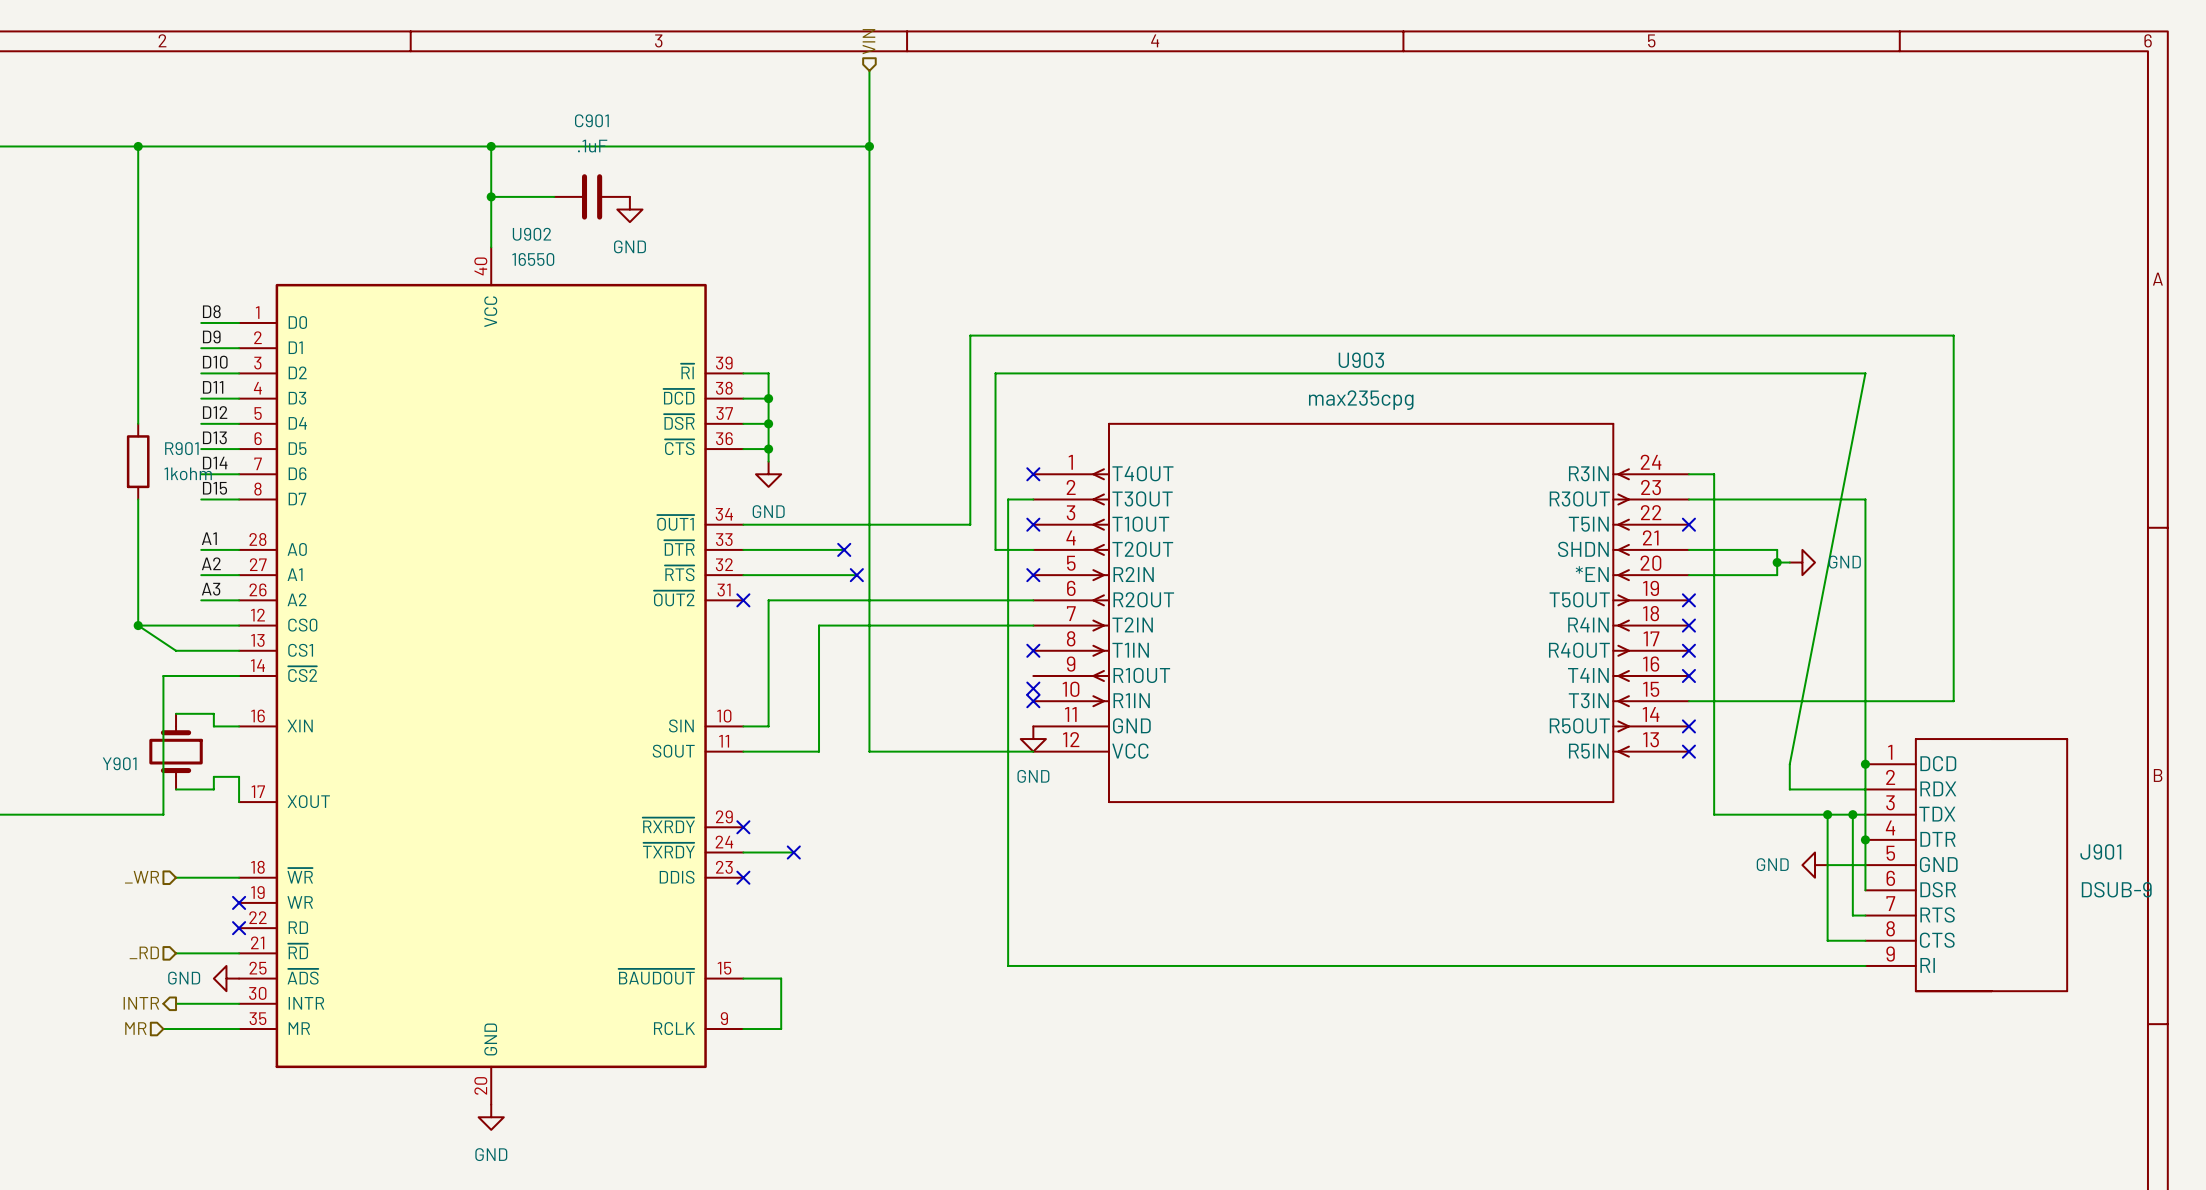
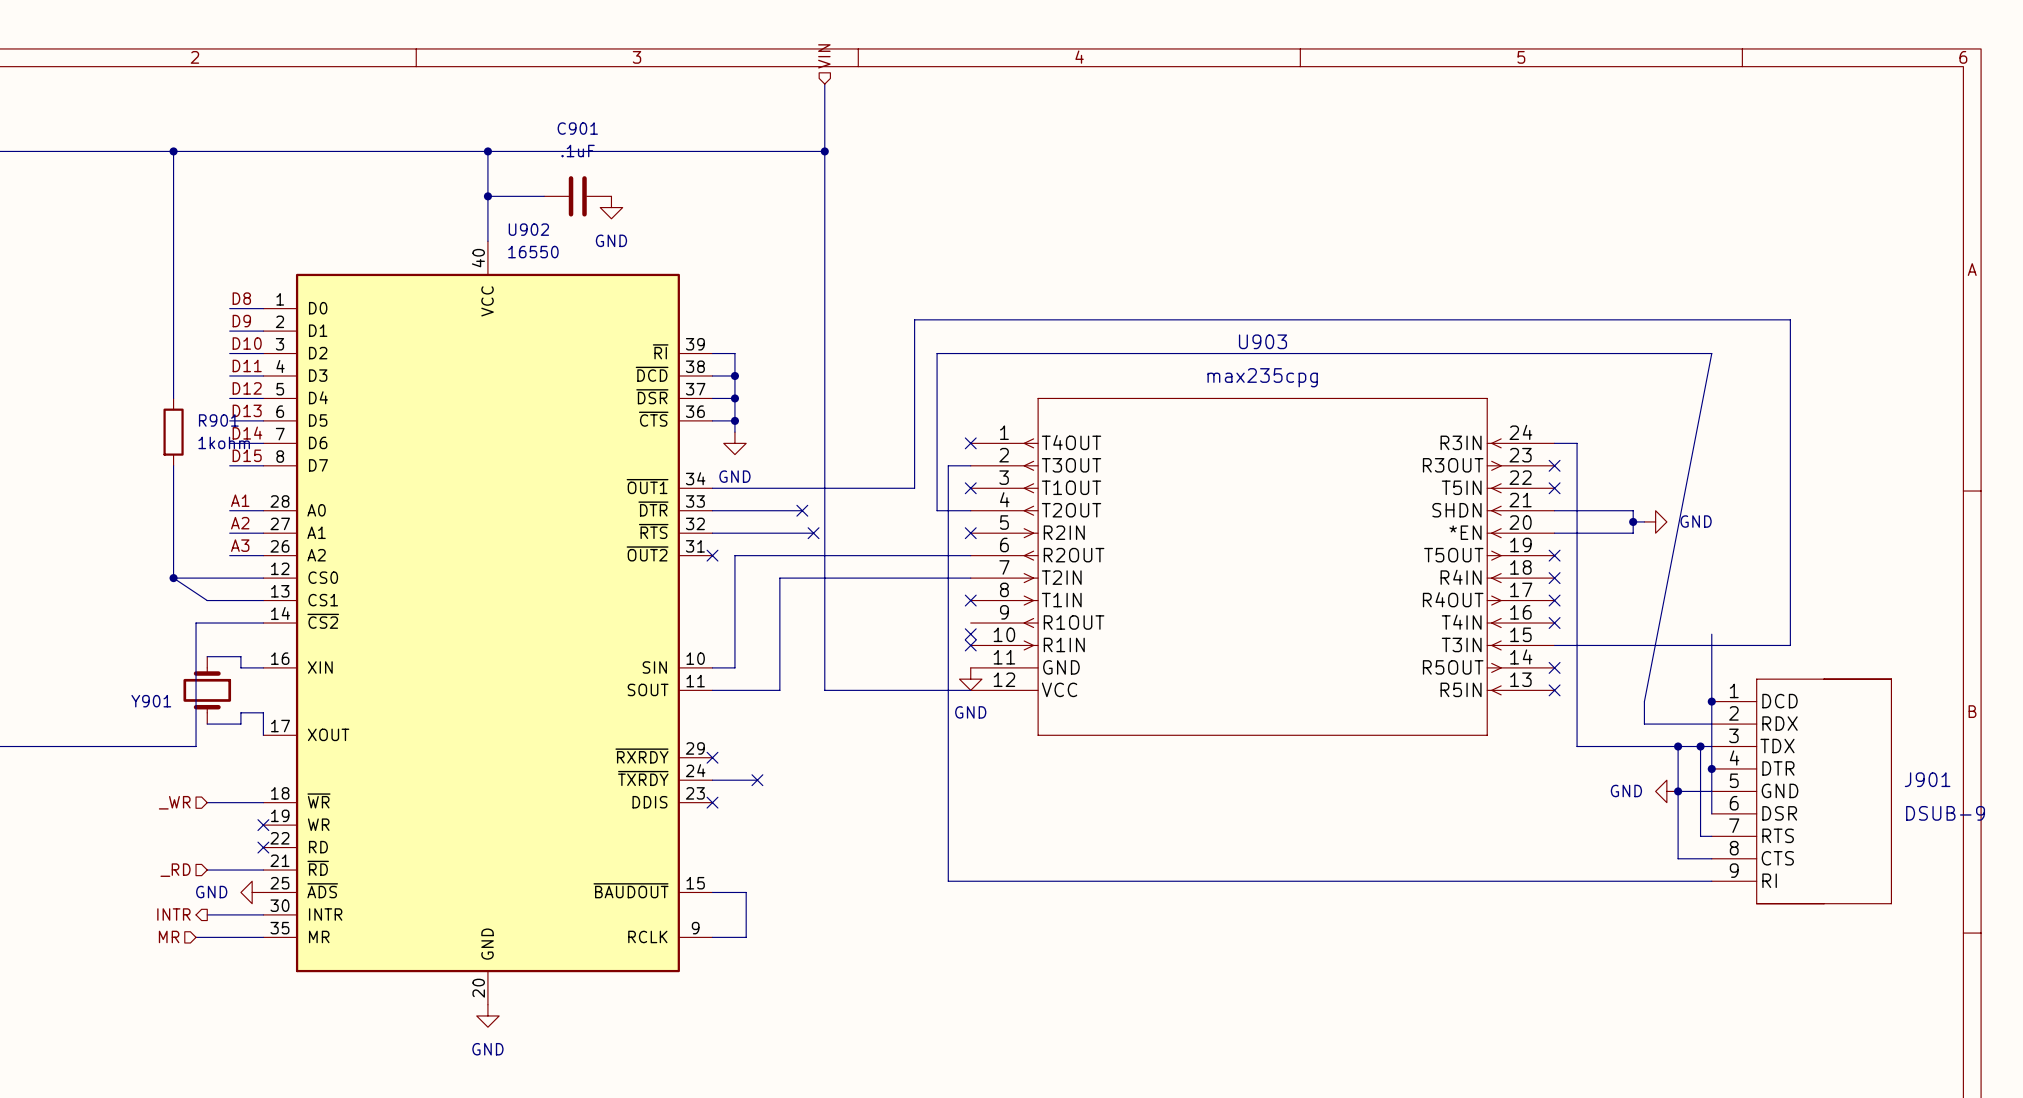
wire: (1688, 499) (1865, 499) (1865, 688) -> none
no-connect mark: none -> (1554, 465)
junction: none -> (1678, 791)

